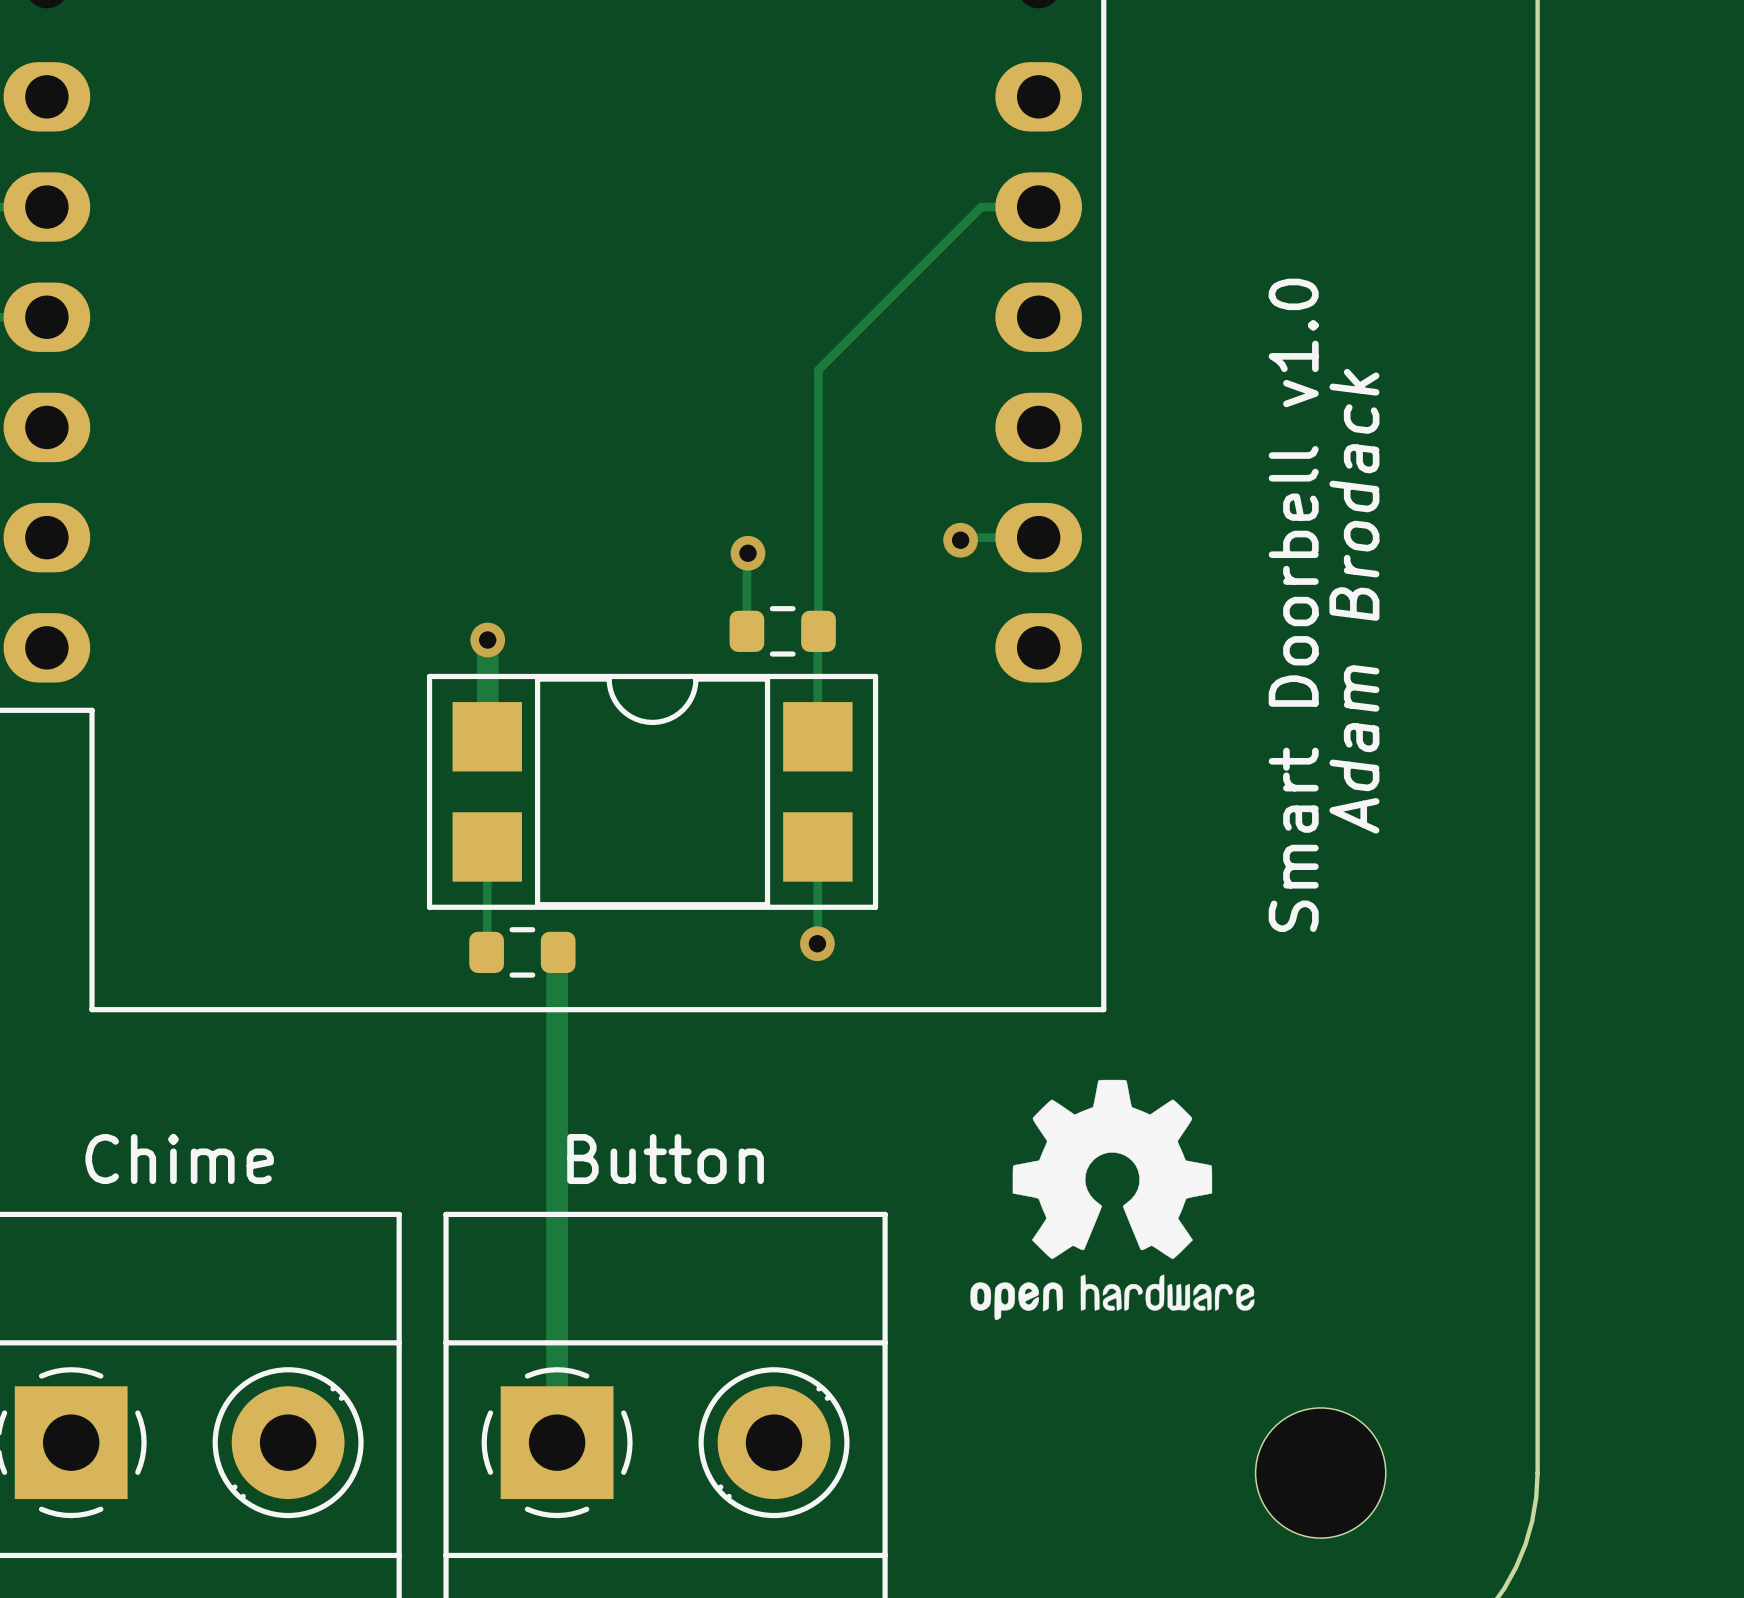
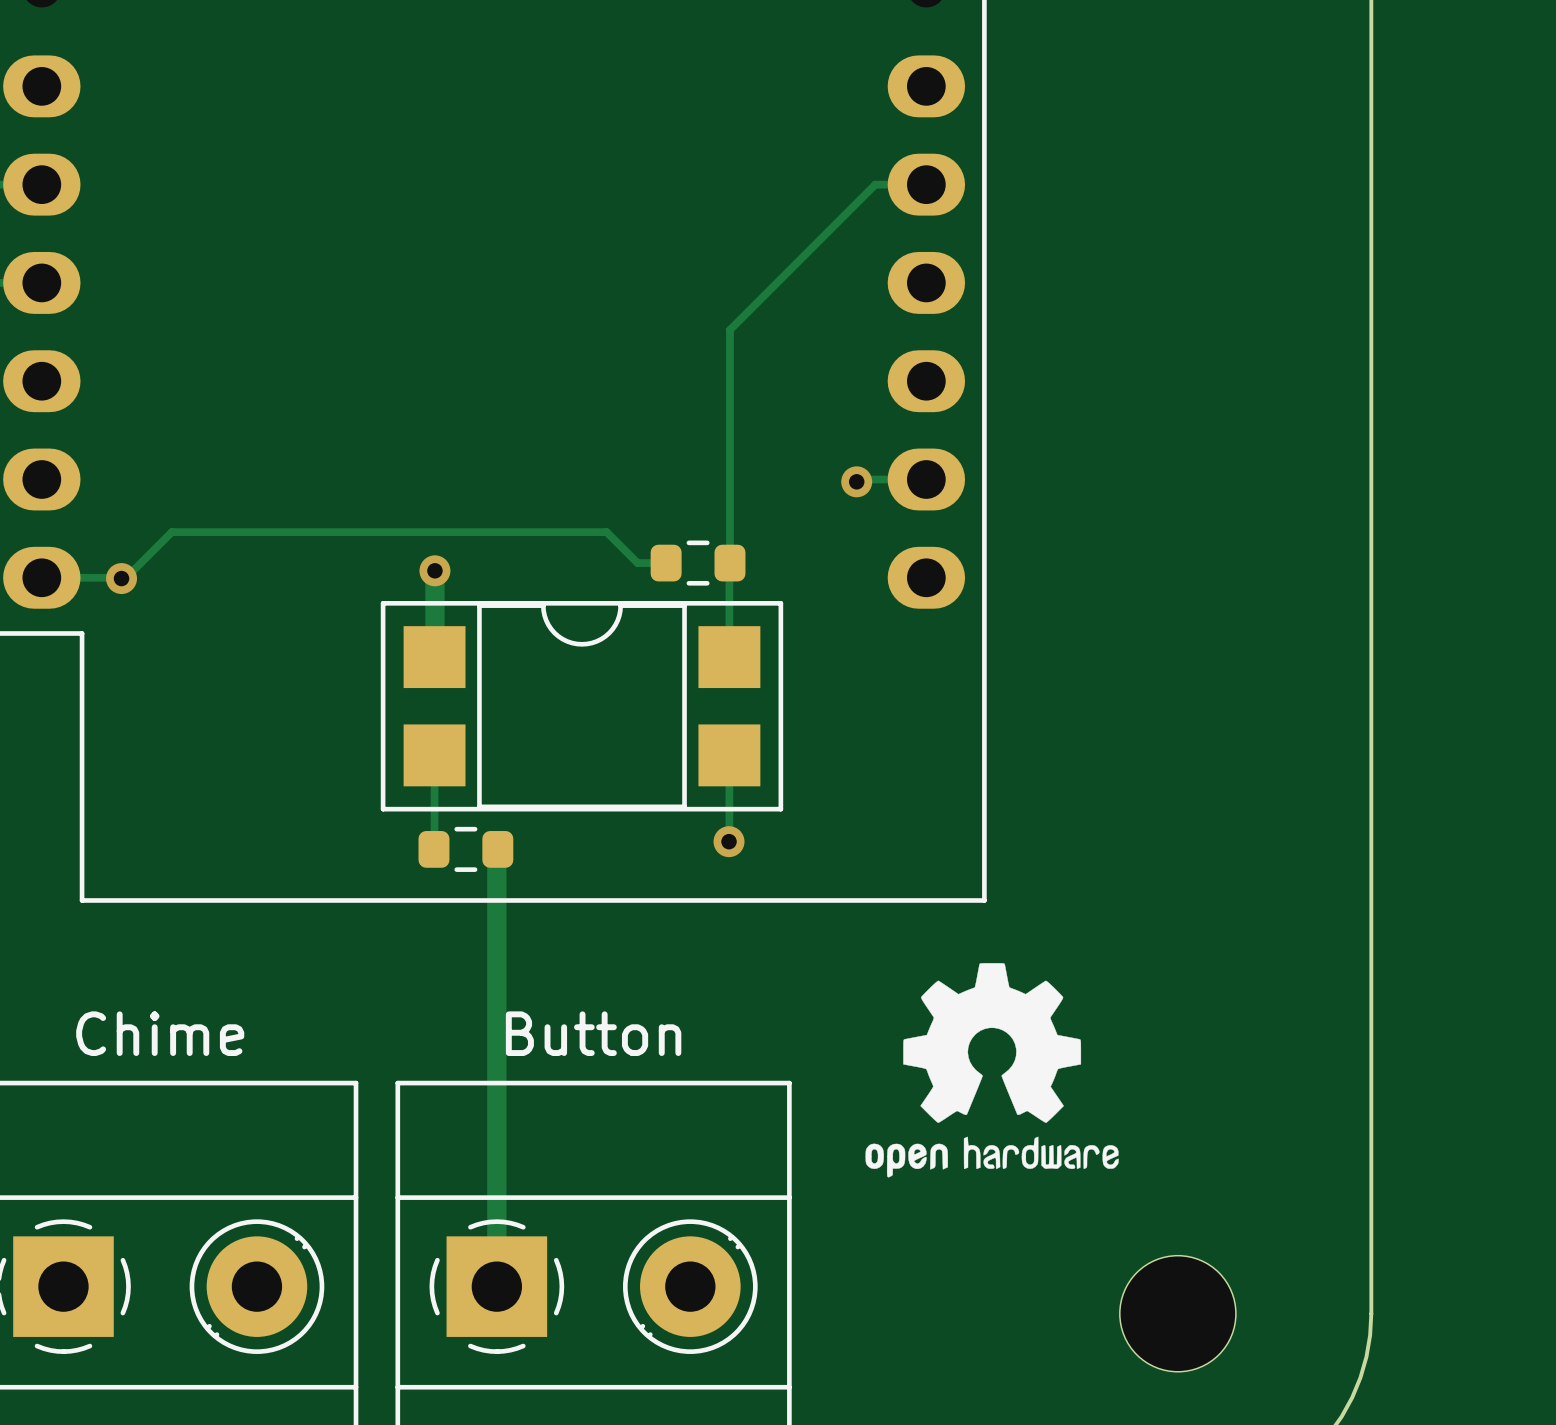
track: (748, 553) (746, 631) -> (41, 577) (125, 578) (171, 532) (606, 532) (637, 563) (666, 563)
via: (748, 553) -> none
text: Adam Brodack (1354, 601) -> none
text: Smart Doorbell v1.0 (1293, 605) -> none
via: none -> (121, 578)

